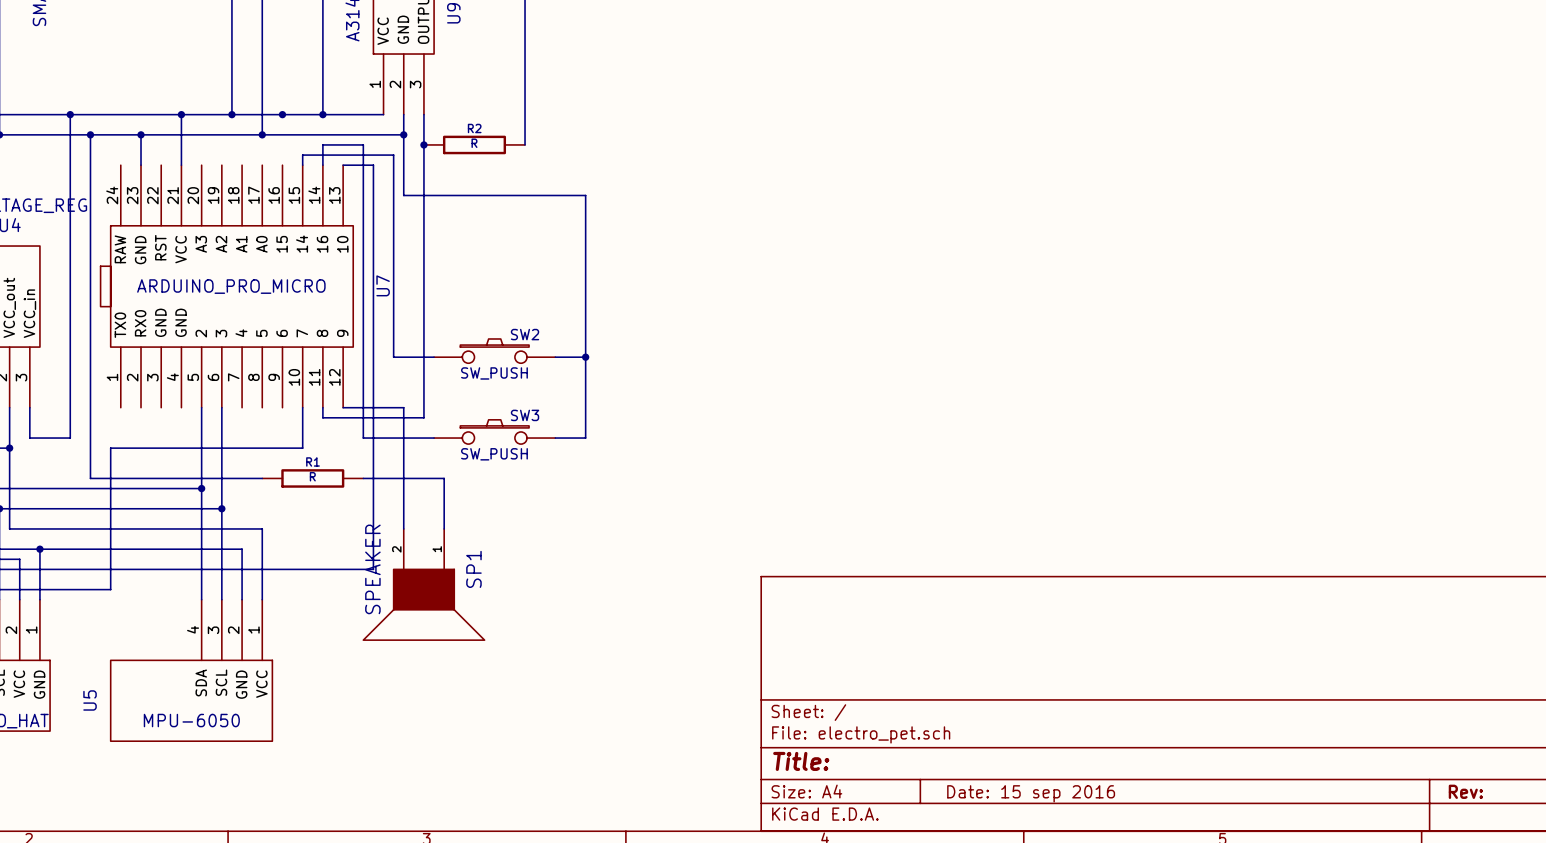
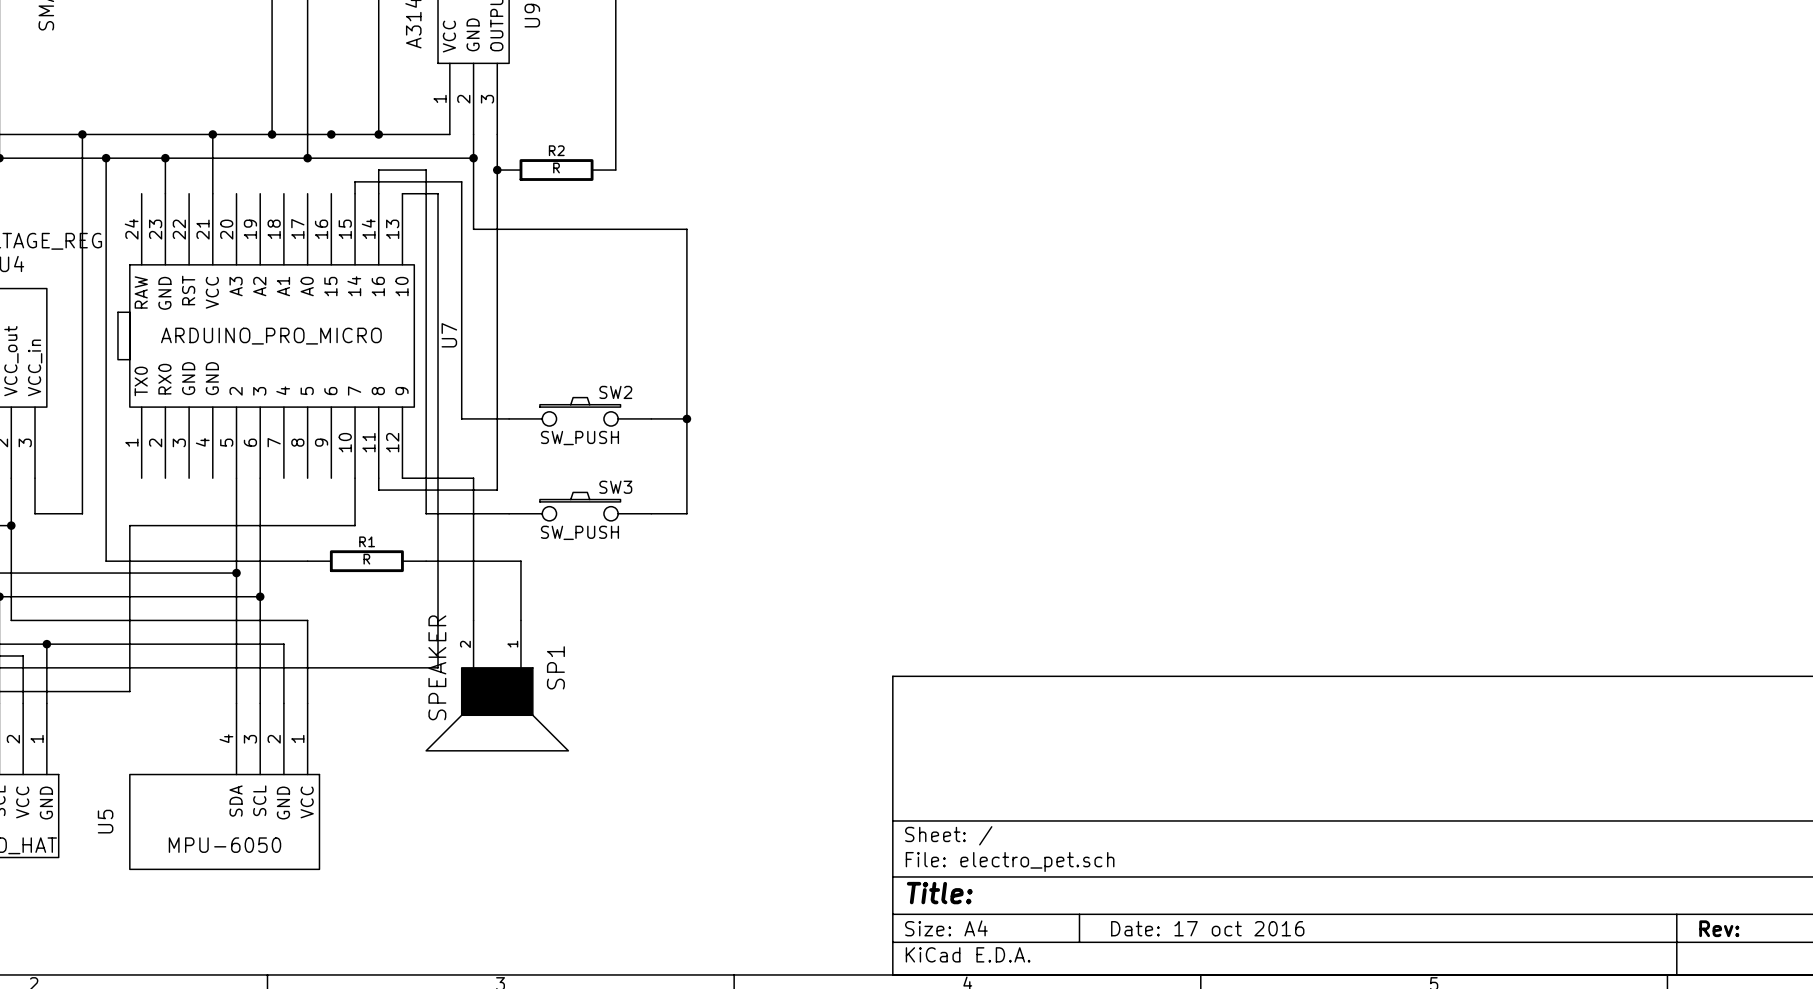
title block: Date: 15 sep 2016 (1031, 793) -> Date: 17 oct 2016 (1207, 928)

